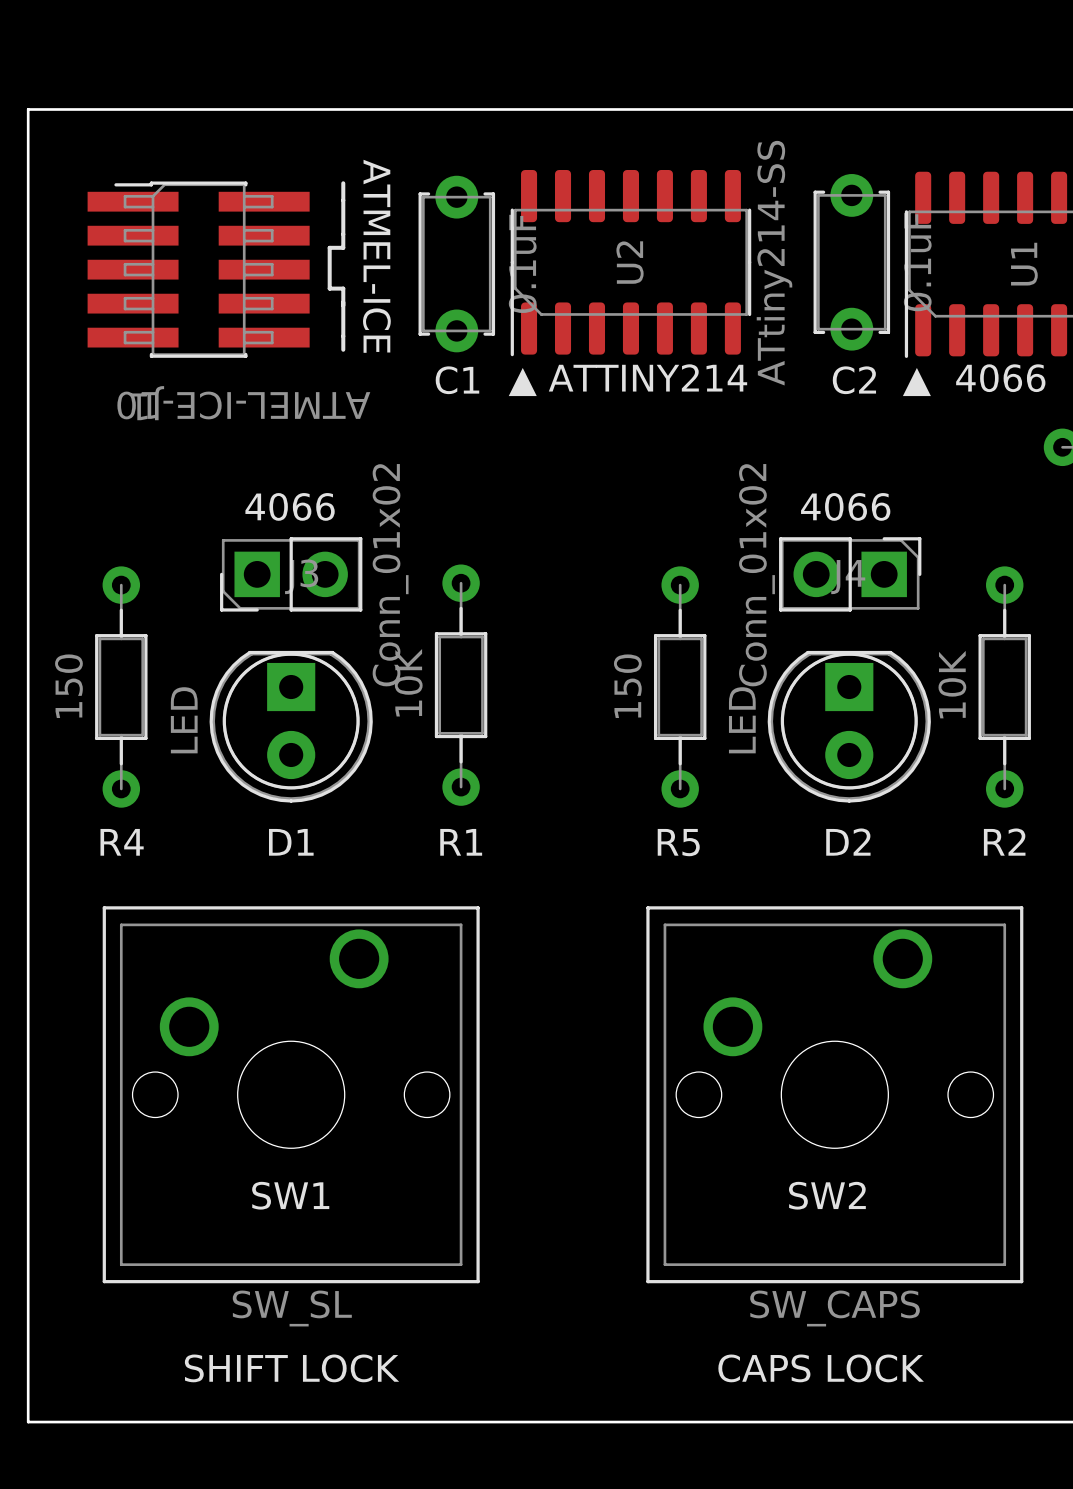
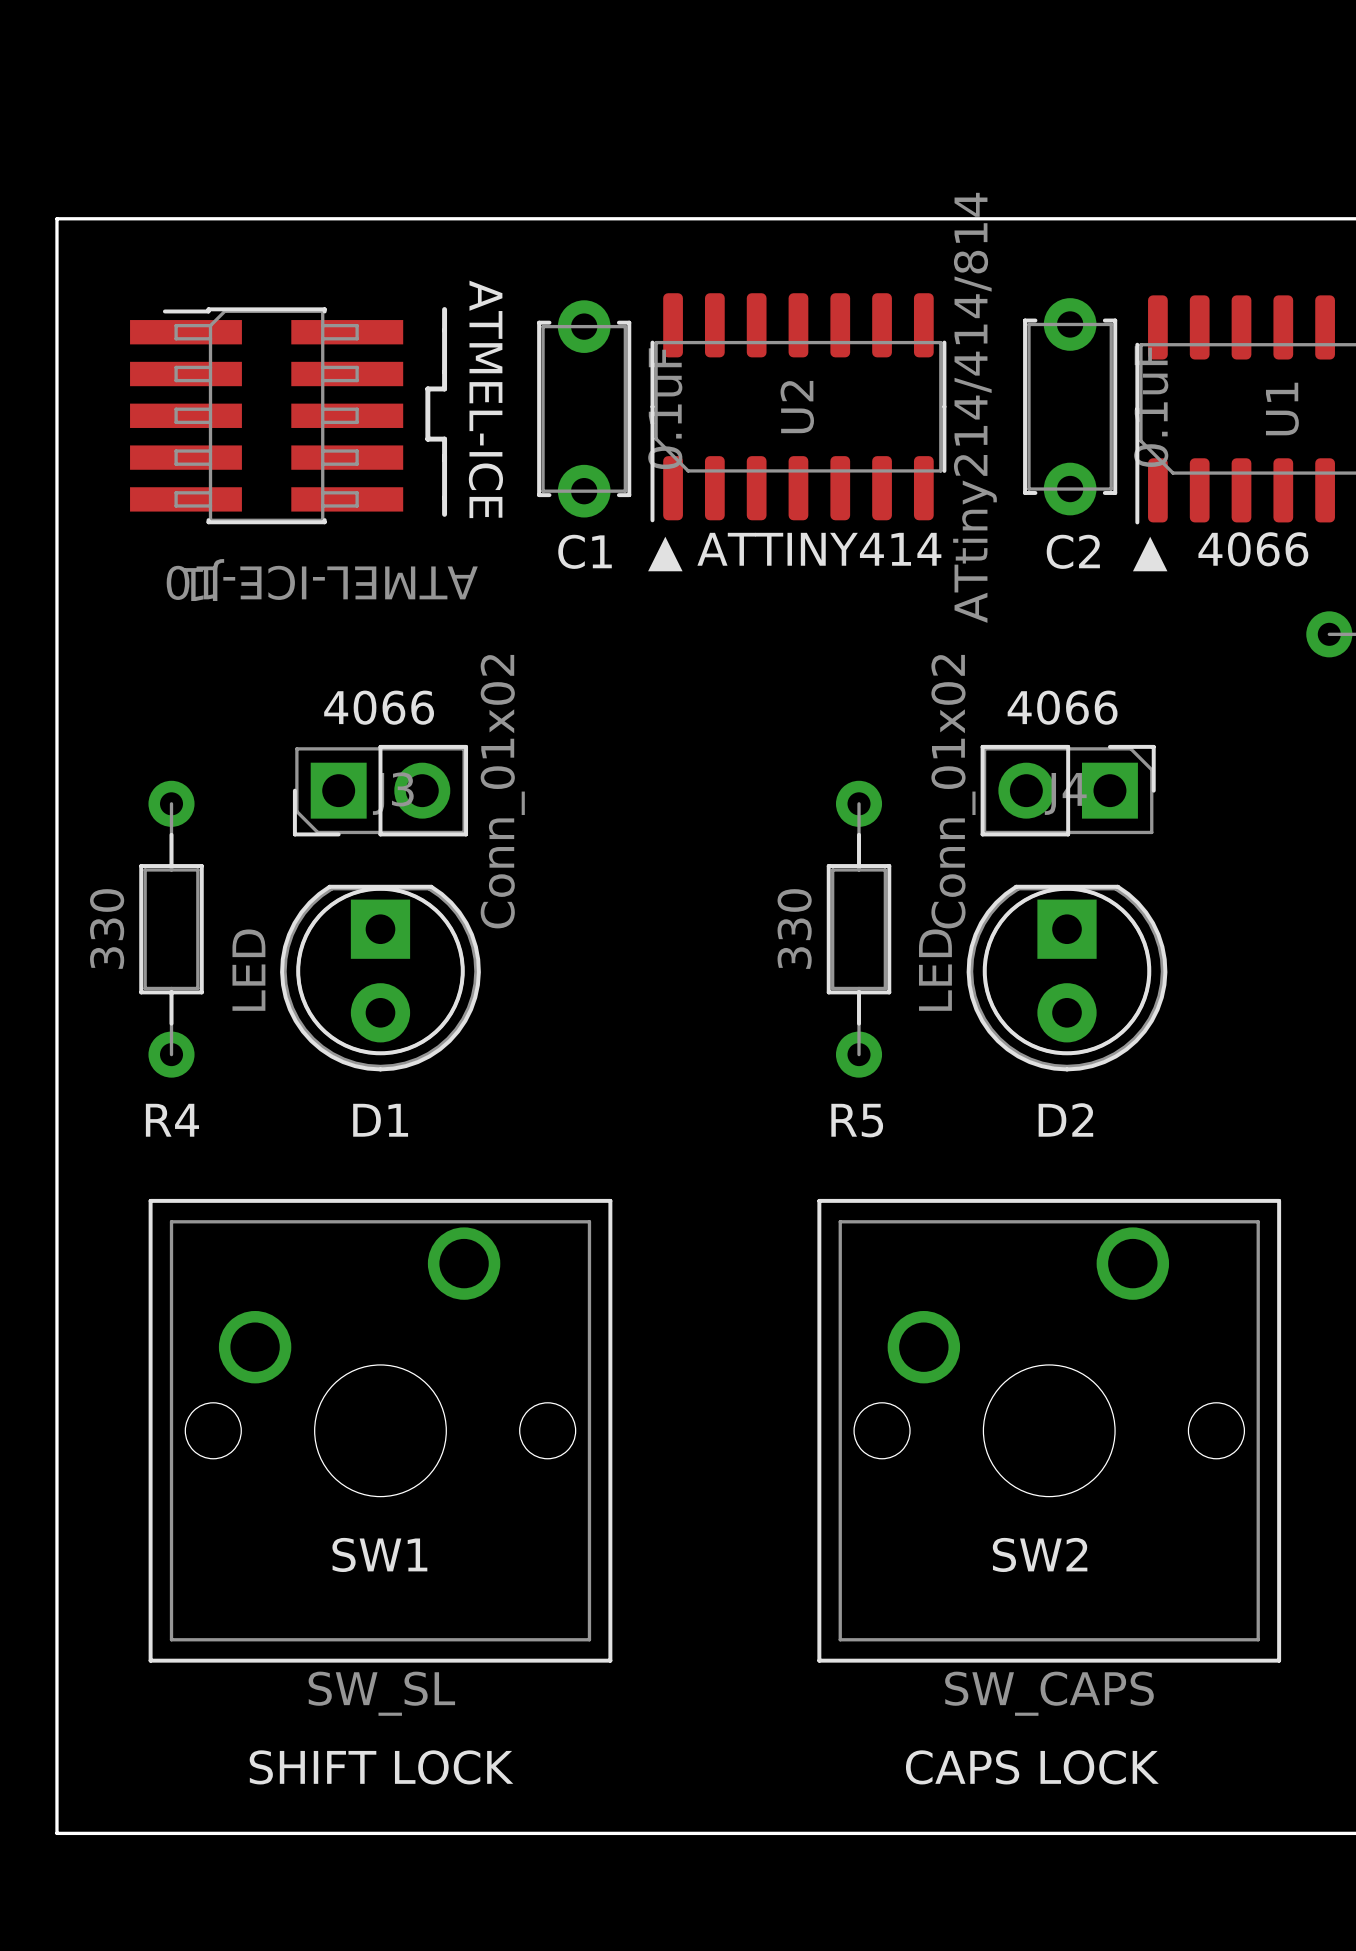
U2 value: ATtiny214-SS (774, 263) -> ATtiny214/414/814 (974, 407)
text: ▲ ATTINY214 (627, 380) -> ▲ ATTINY414 (794, 552)
R1: 10K (461, 685) -> none
R4 value: 150 (68, 686) -> 330 (107, 928)
R5 value: 150 (627, 686) -> 330 (794, 928)
R2: 10K (1004, 687) -> none

